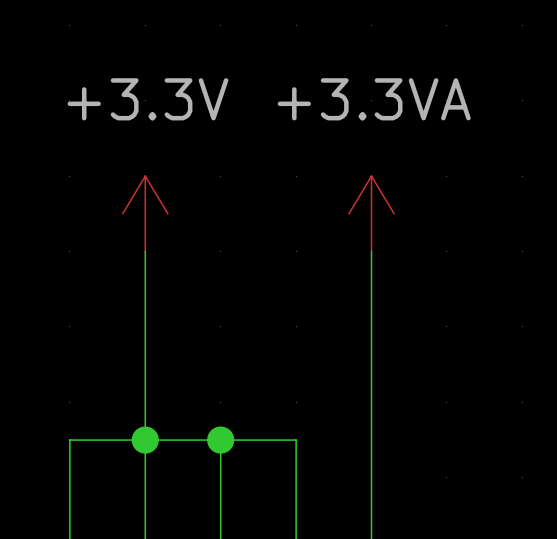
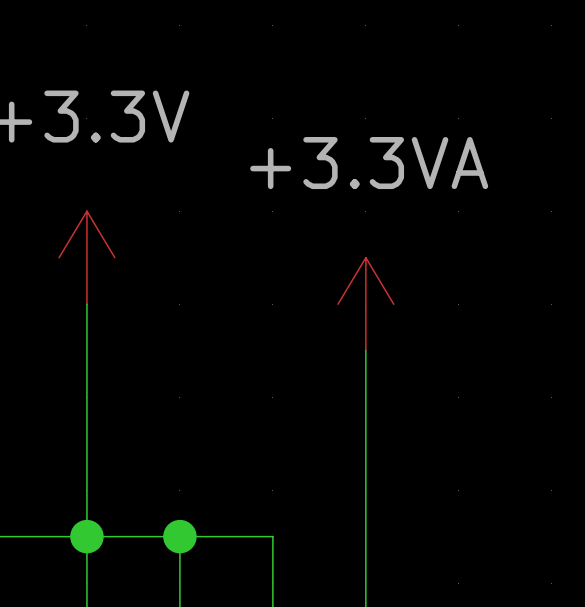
power symbol position: +3.3VA (371, 213) -> +3.3VA (365, 304)

